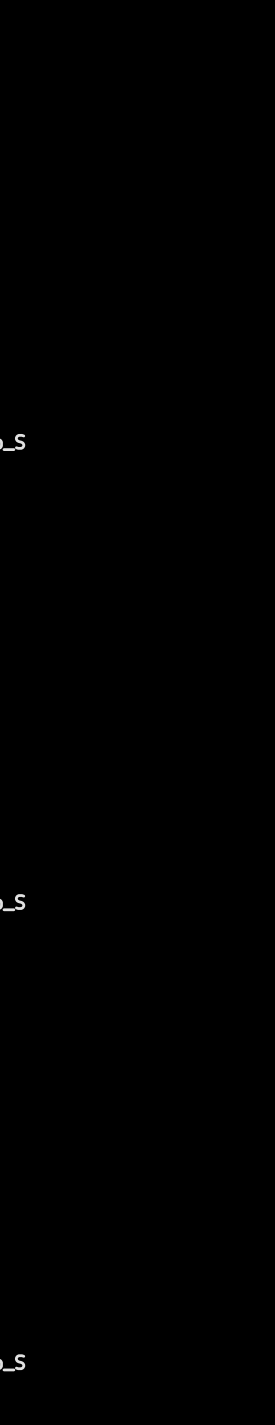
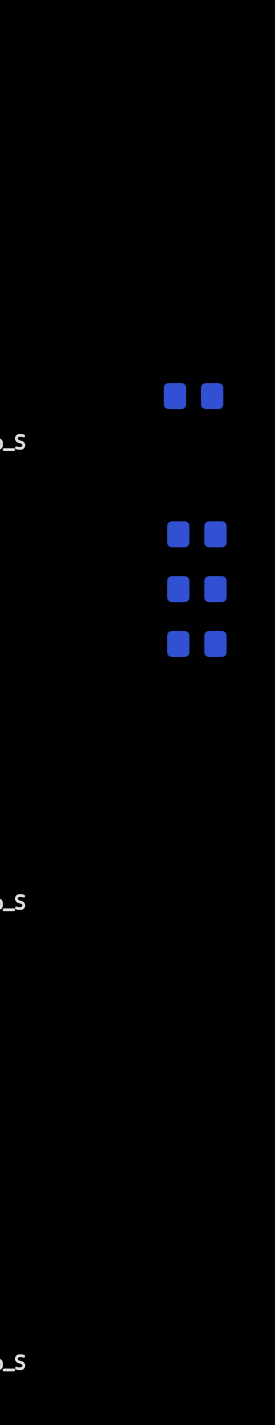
part: none -> (193, 396)
part: none -> (196, 534)
part: none -> (196, 589)
part: none -> (196, 643)

